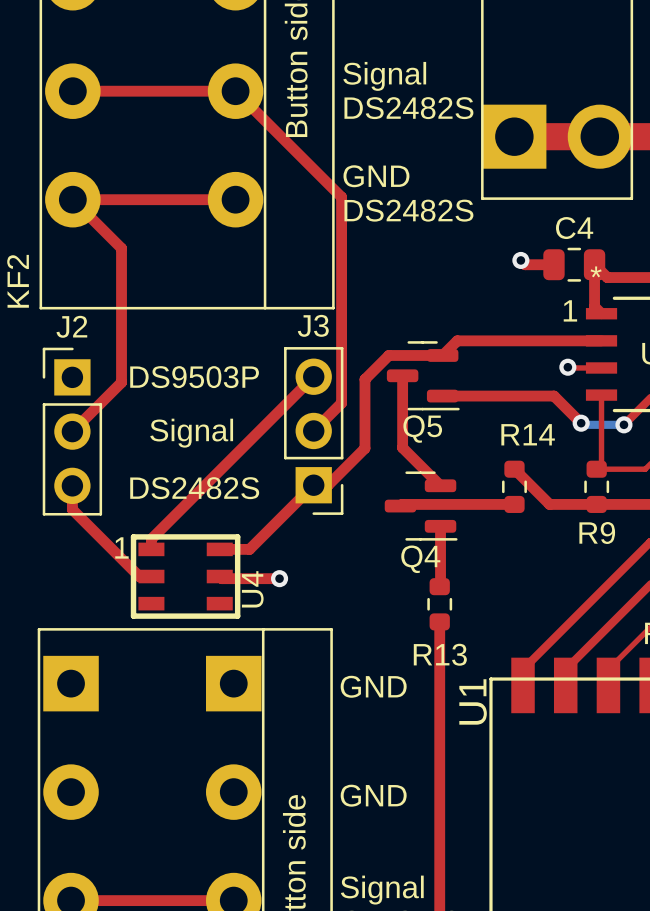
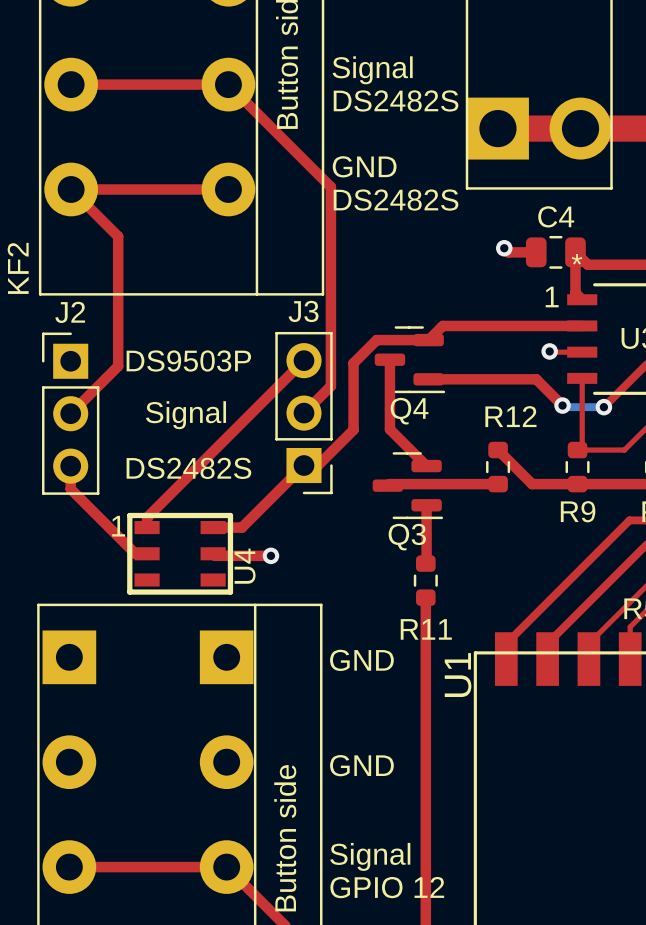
Q5 name: Q5 (422, 429) -> Q4 (409, 411)
R14 name: R14 (528, 434) -> R12 (510, 416)
Q4 name: Q4 (420, 559) -> Q3 (407, 537)
R13 name: R13 (440, 654) -> R11 (426, 629)

